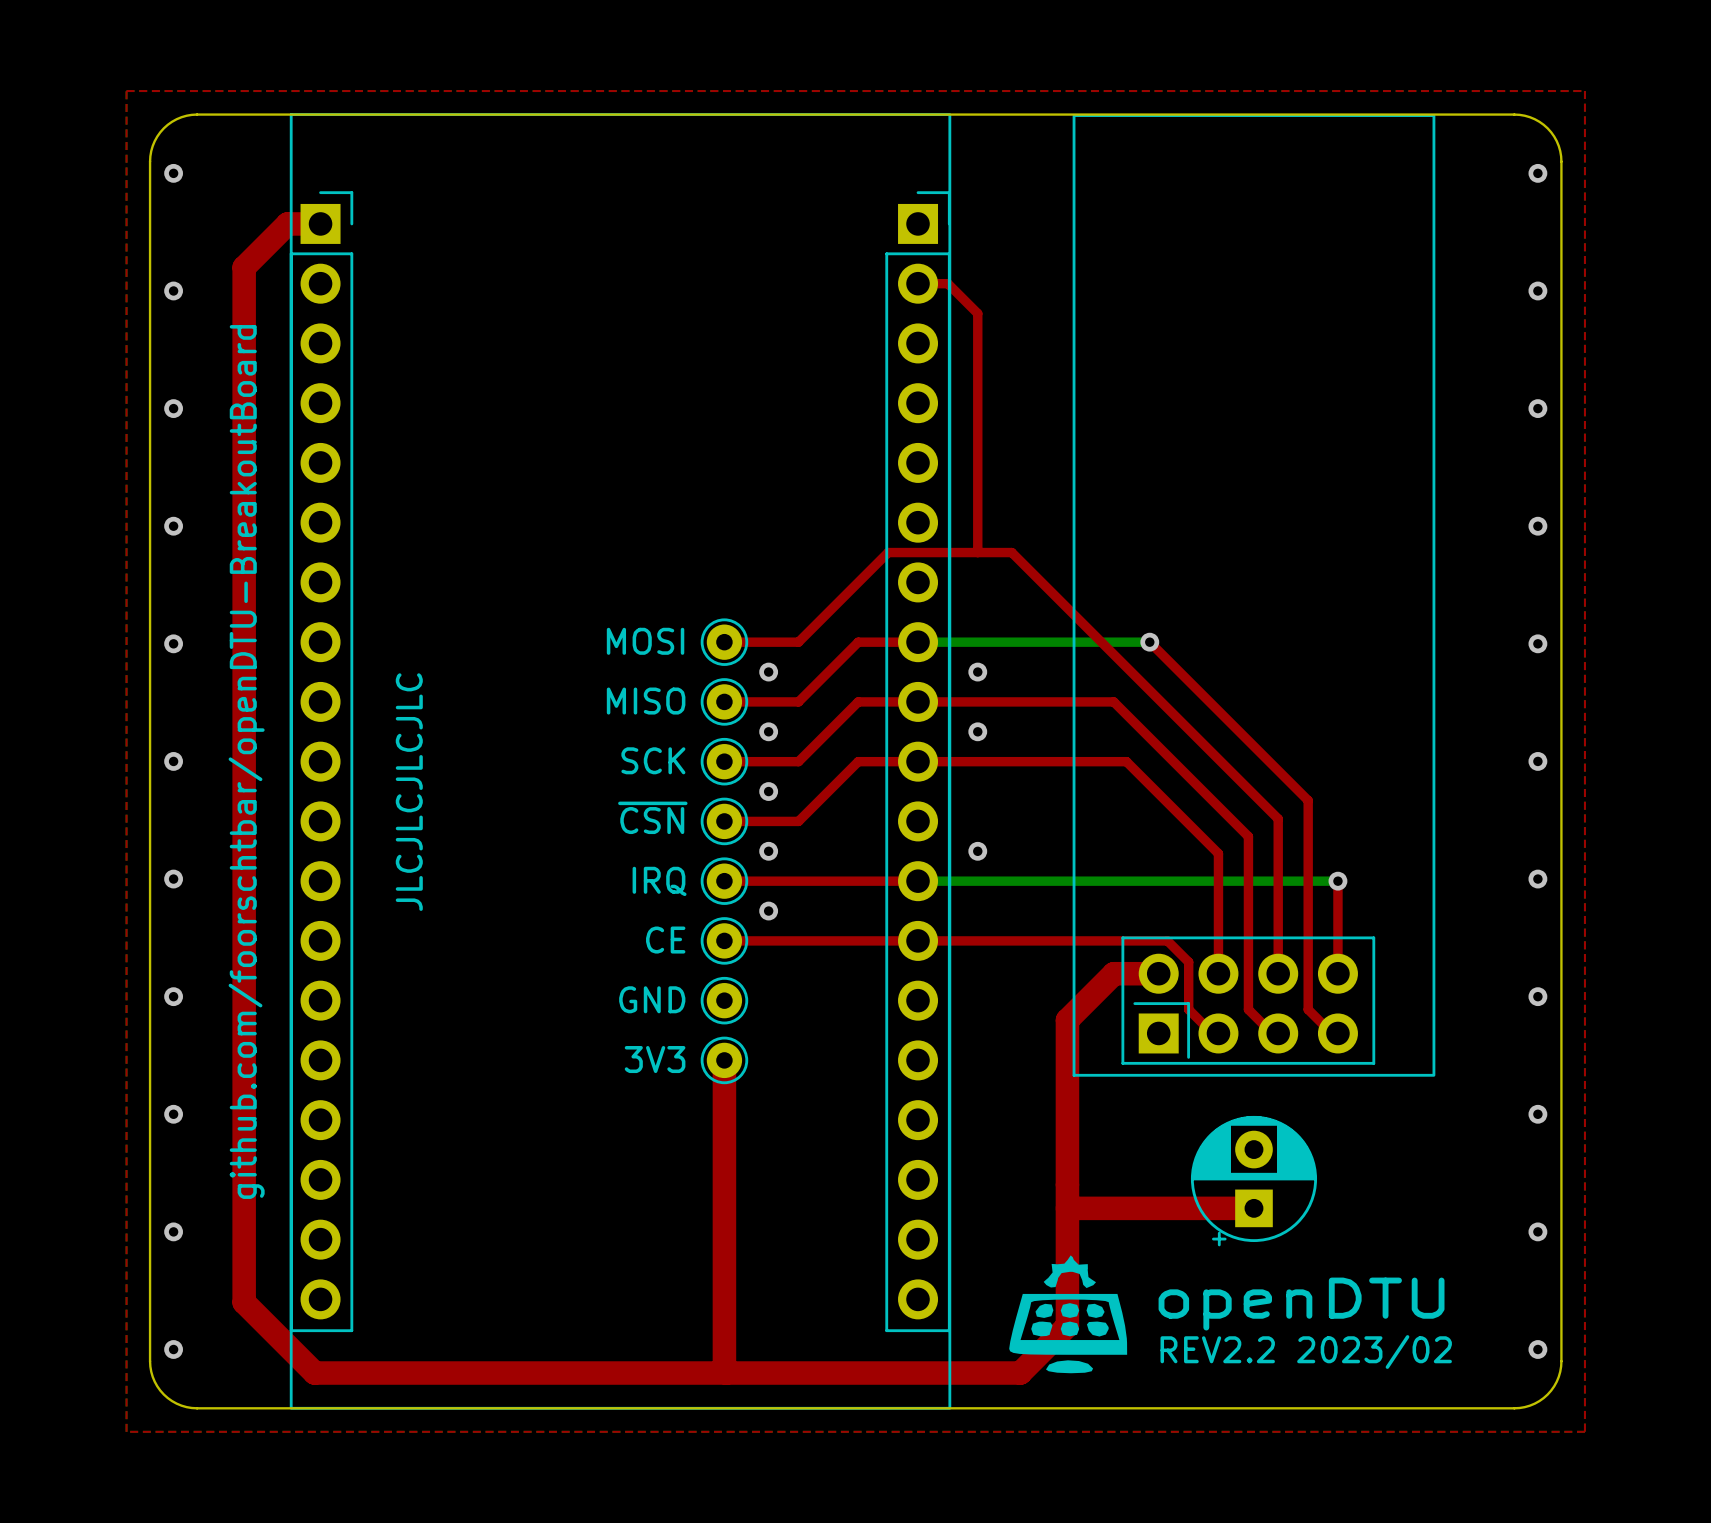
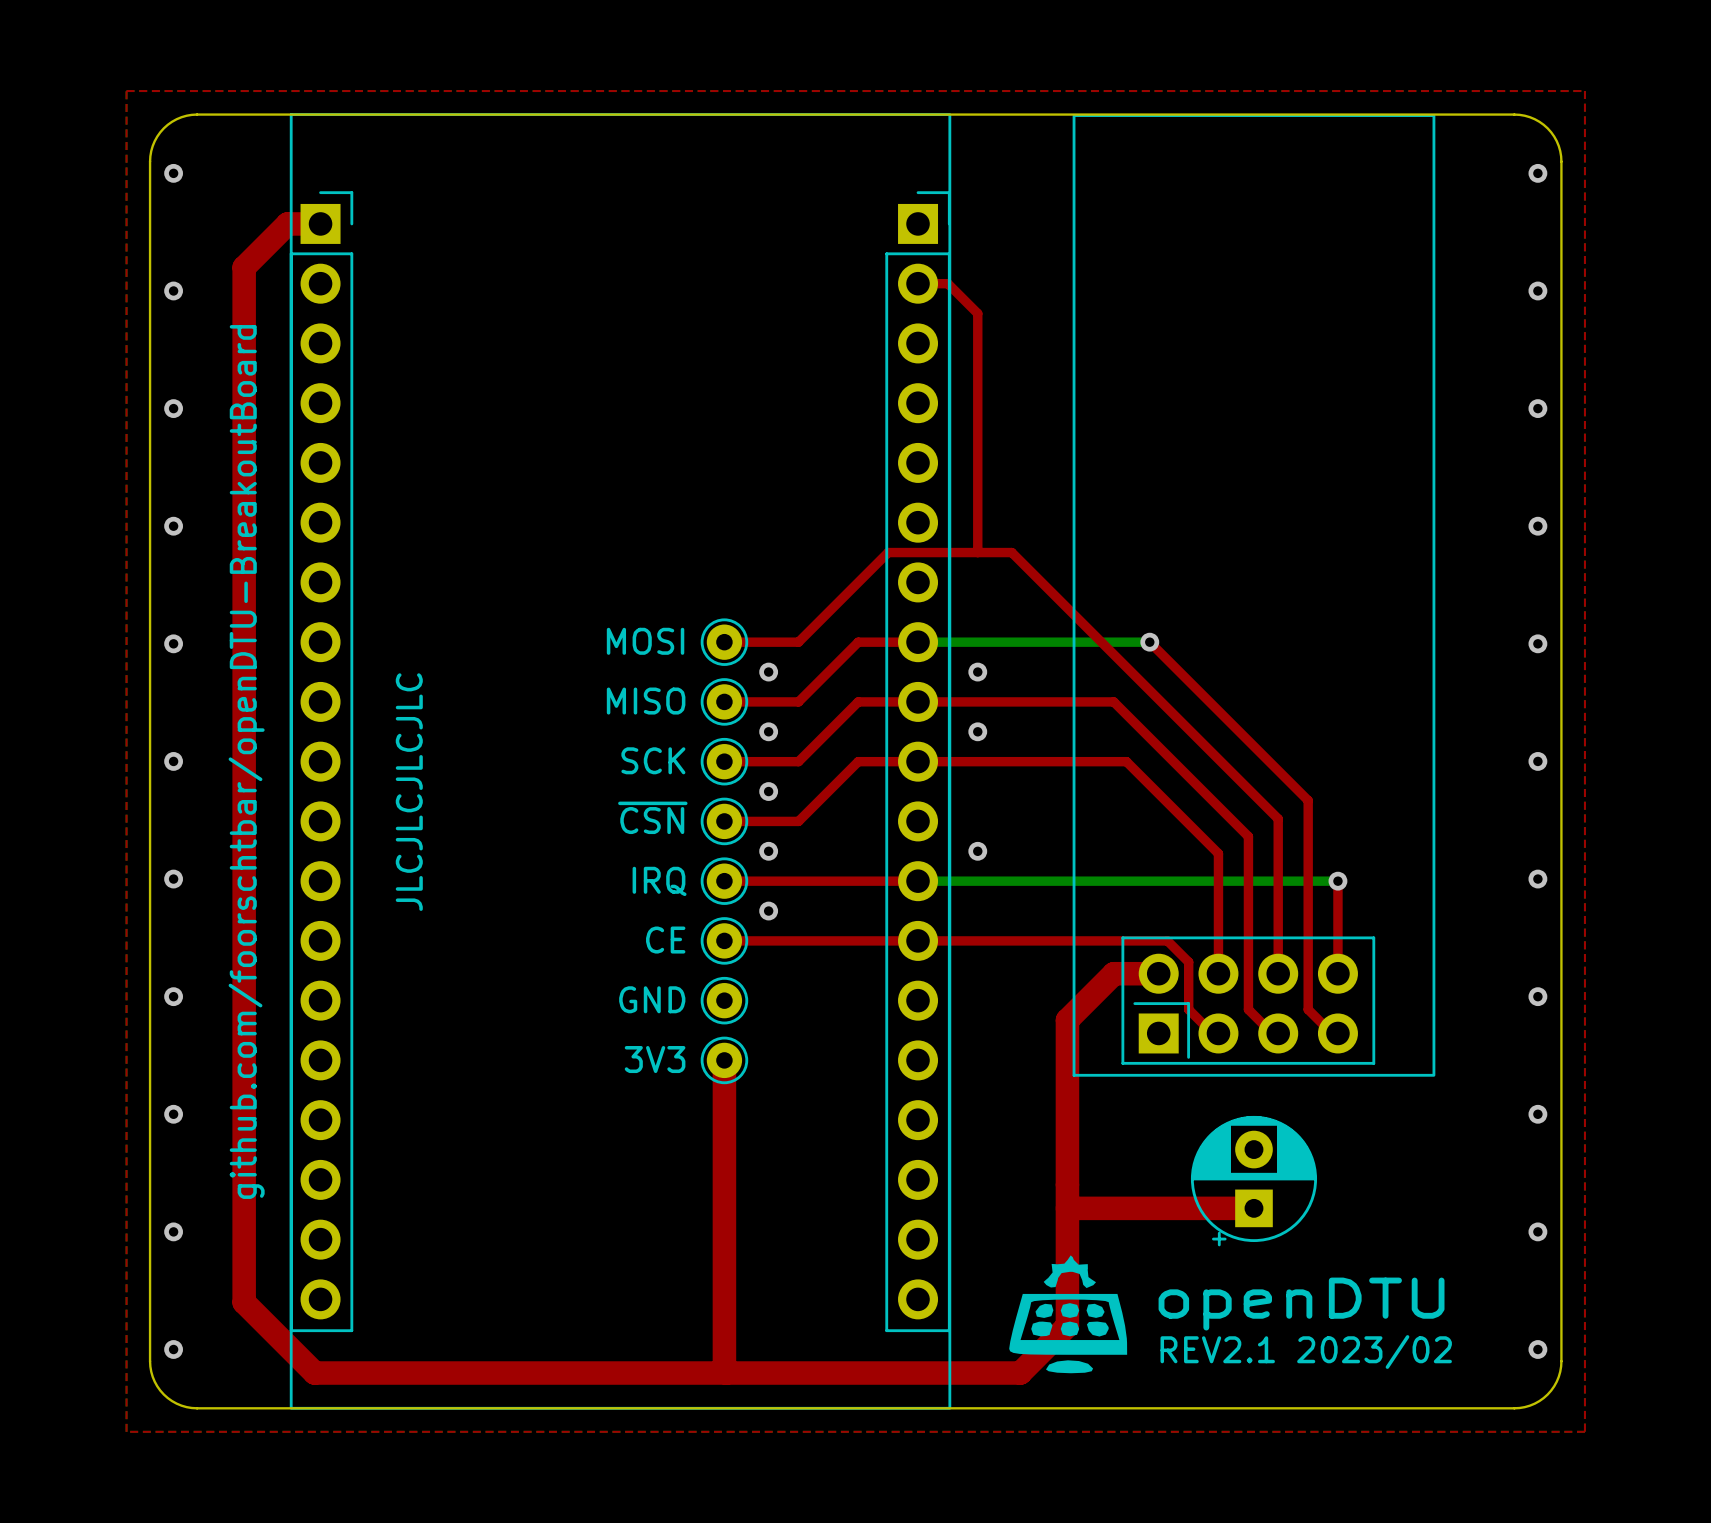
text: REV2.2 2023/02 (1306, 1352) -> REV2.1 2023/02 (1306, 1352)

